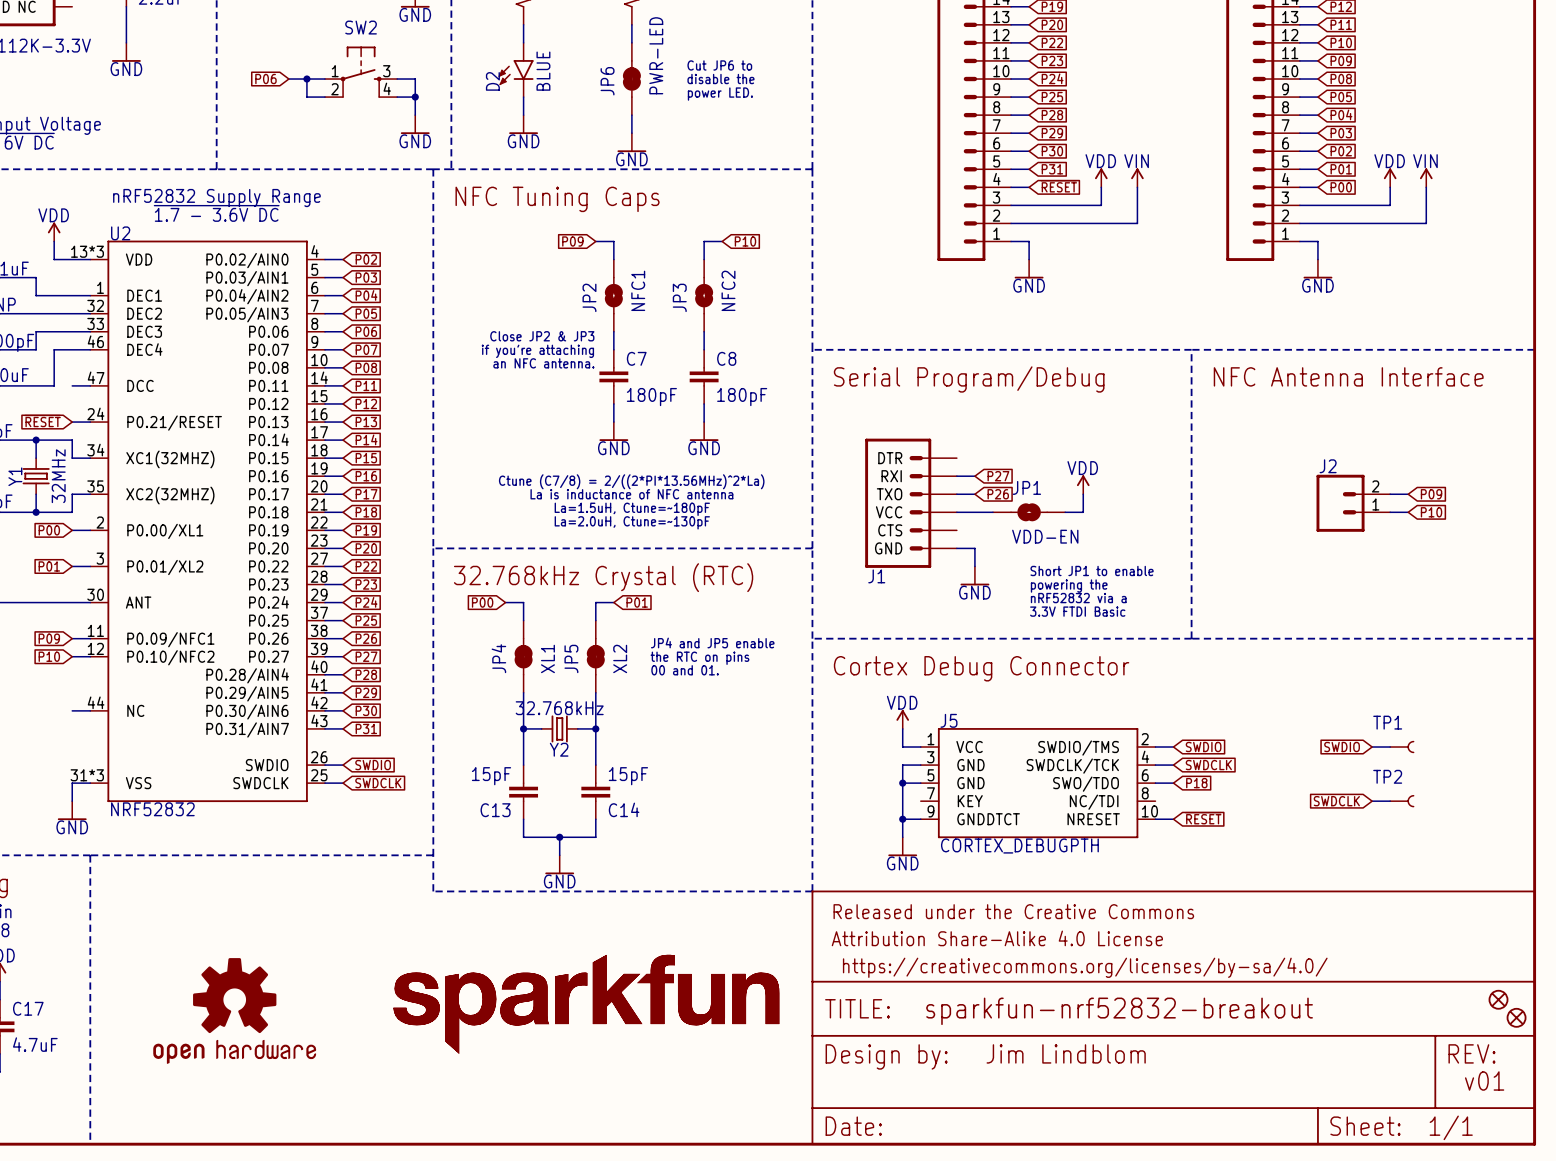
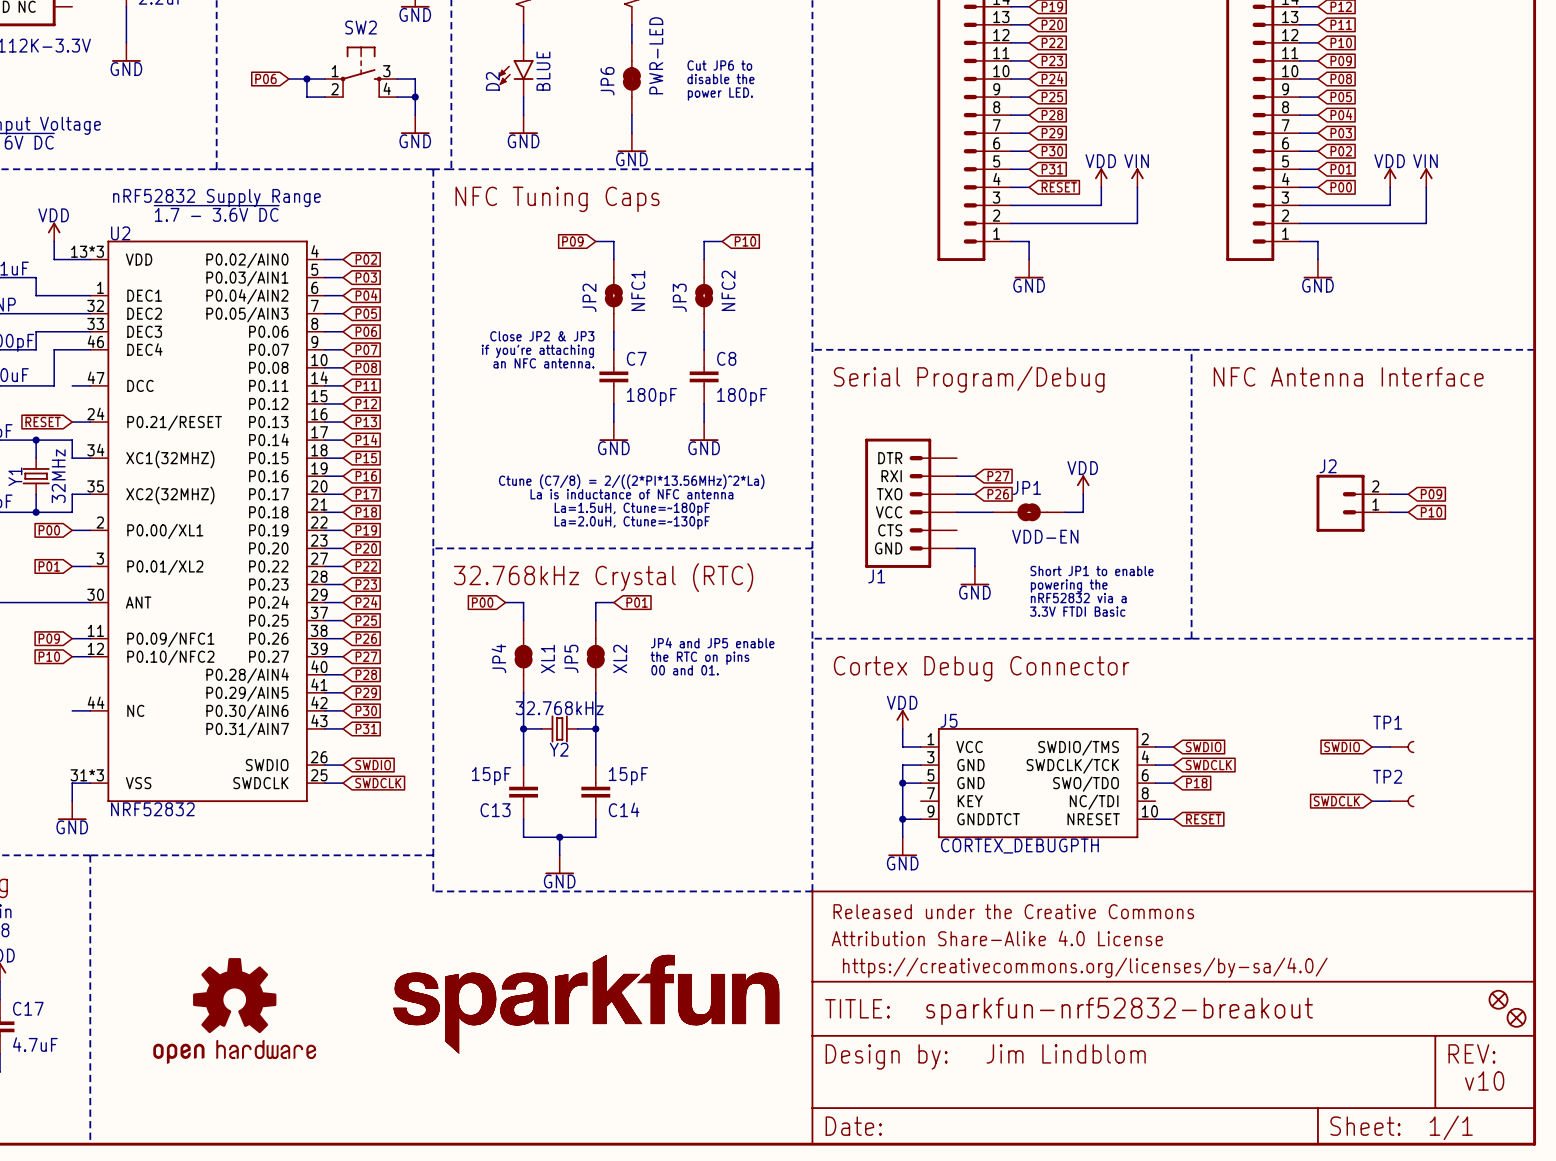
text: v01 (1484, 1081) -> v10 (1484, 1081)

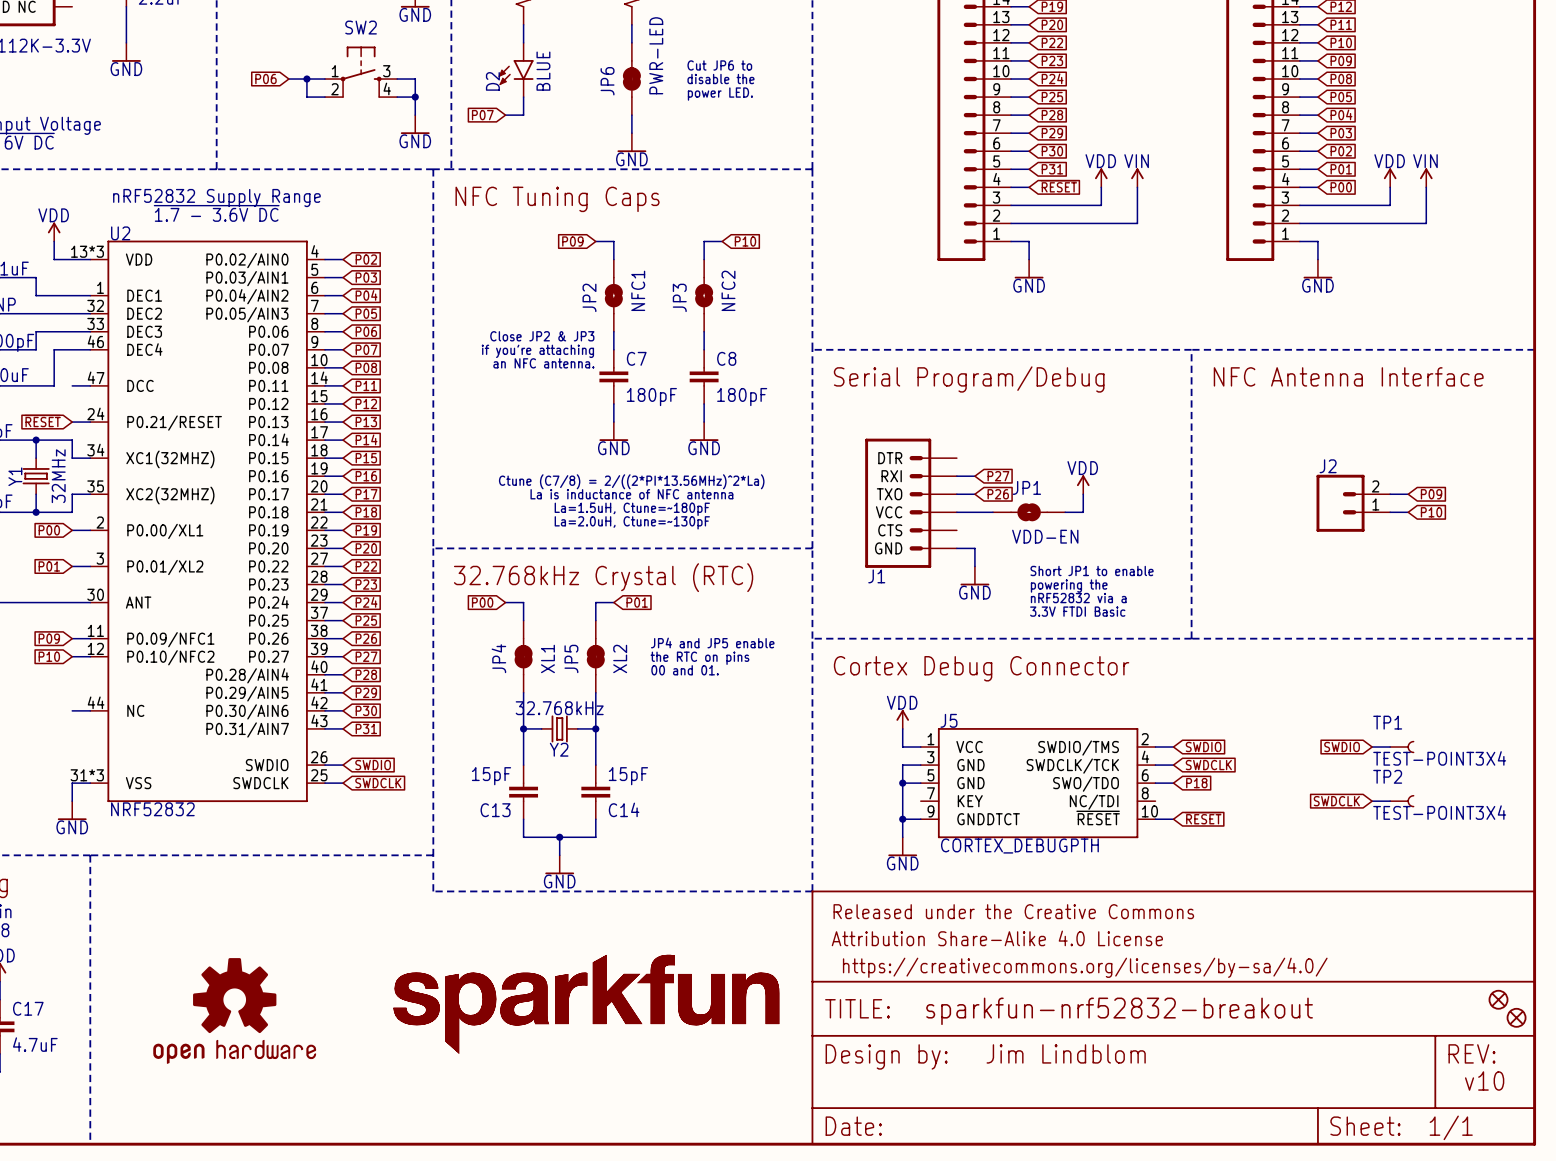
global label: none -> P07 (482, 115)
wire: none -> (505, 115) (523, 115)
power symbol: GND (523, 124) -> none
TP1 value: none -> TEST-POINT3X4 (1439, 758)
TP2 value: none -> TEST-POINT3X4 (1439, 812)
J5 pin name: NRESET (1093, 819) -> ~{RESET} (1098, 817)

